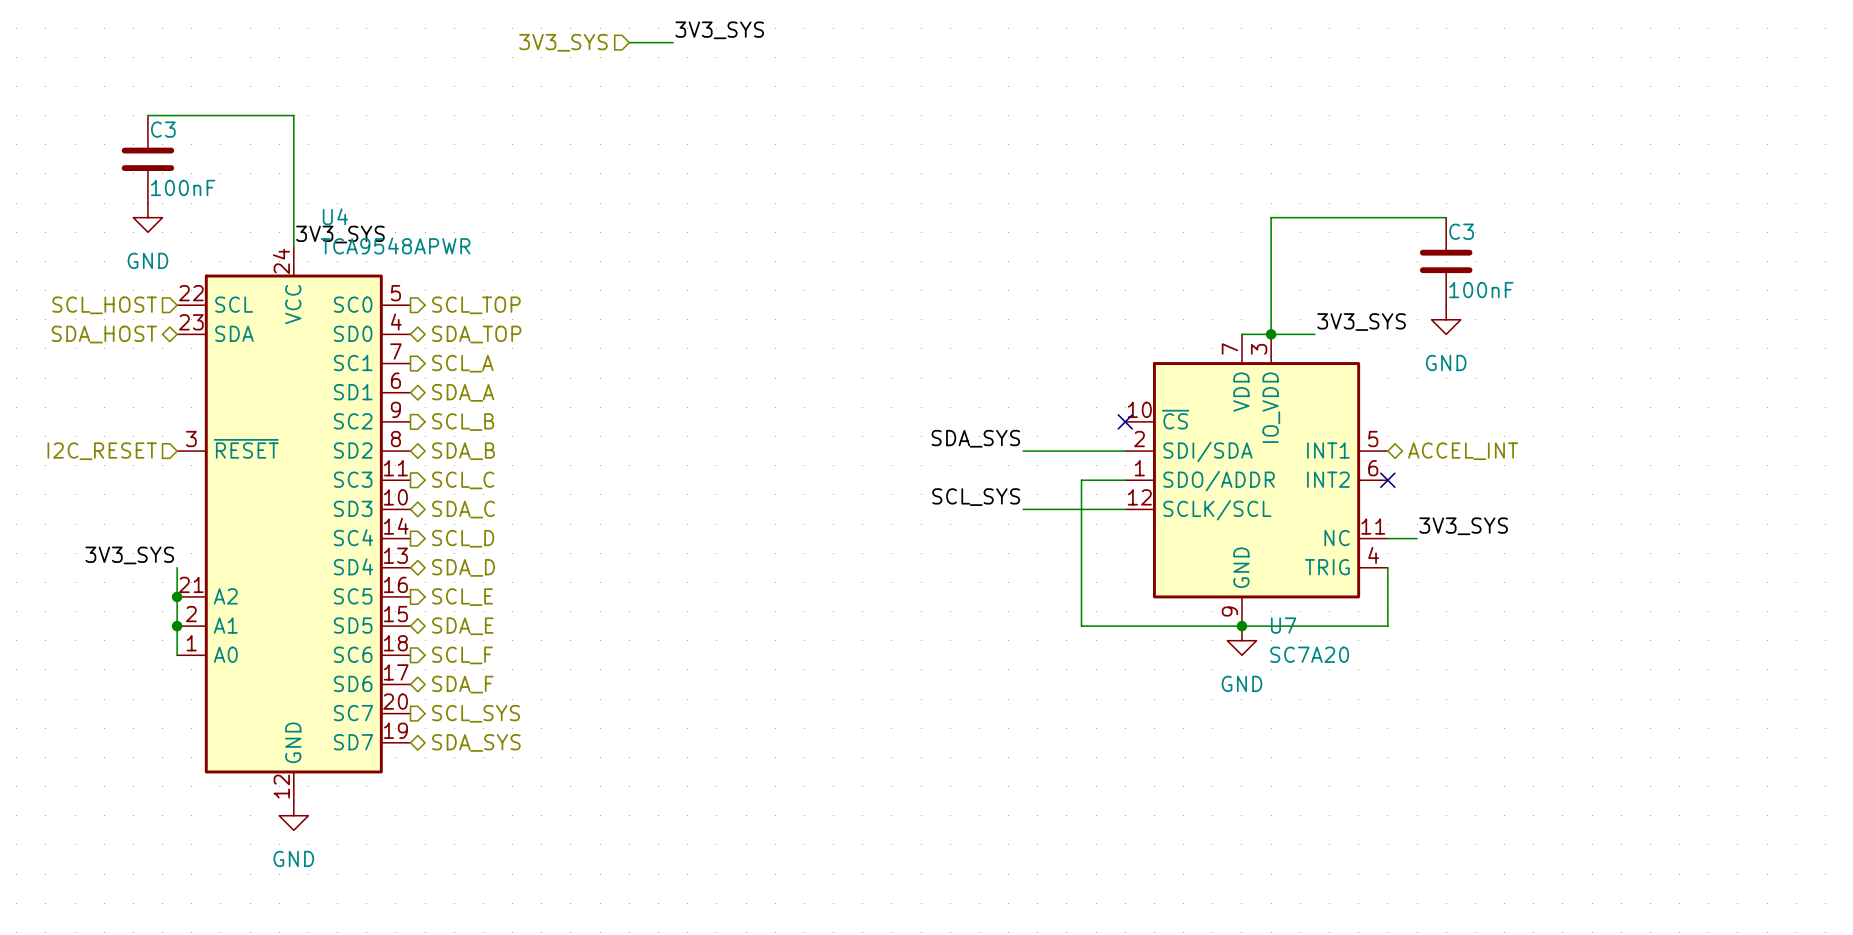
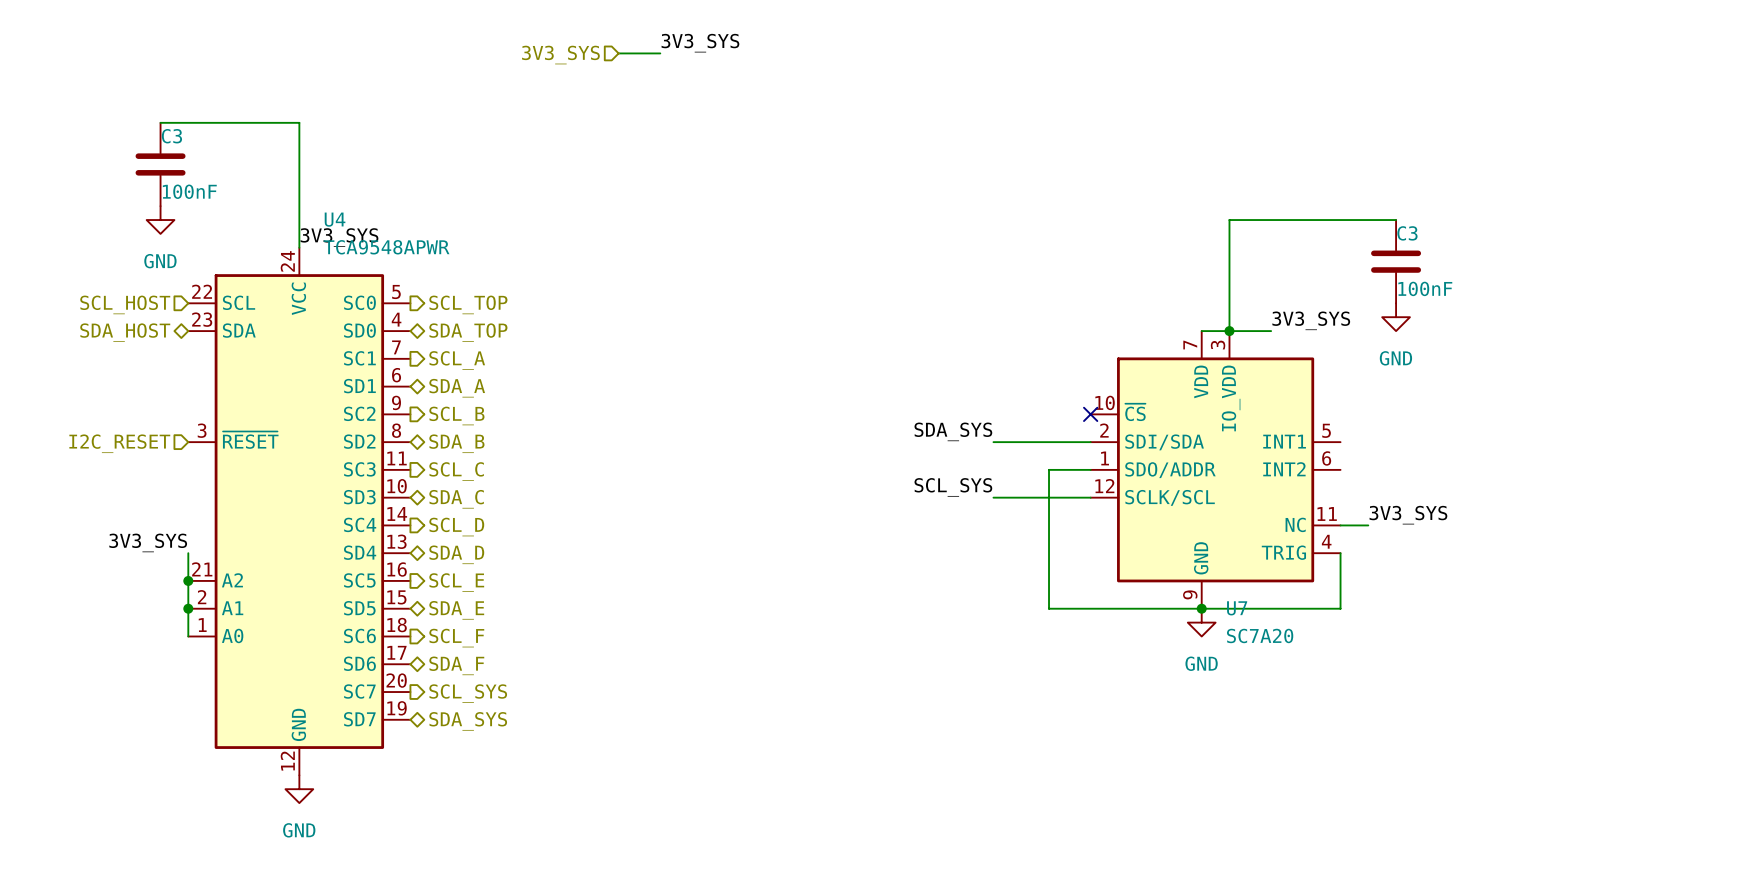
hierarchical label: ACCEL_INT (1463, 451) -> none
no-connect mark: (1387, 480) -> none

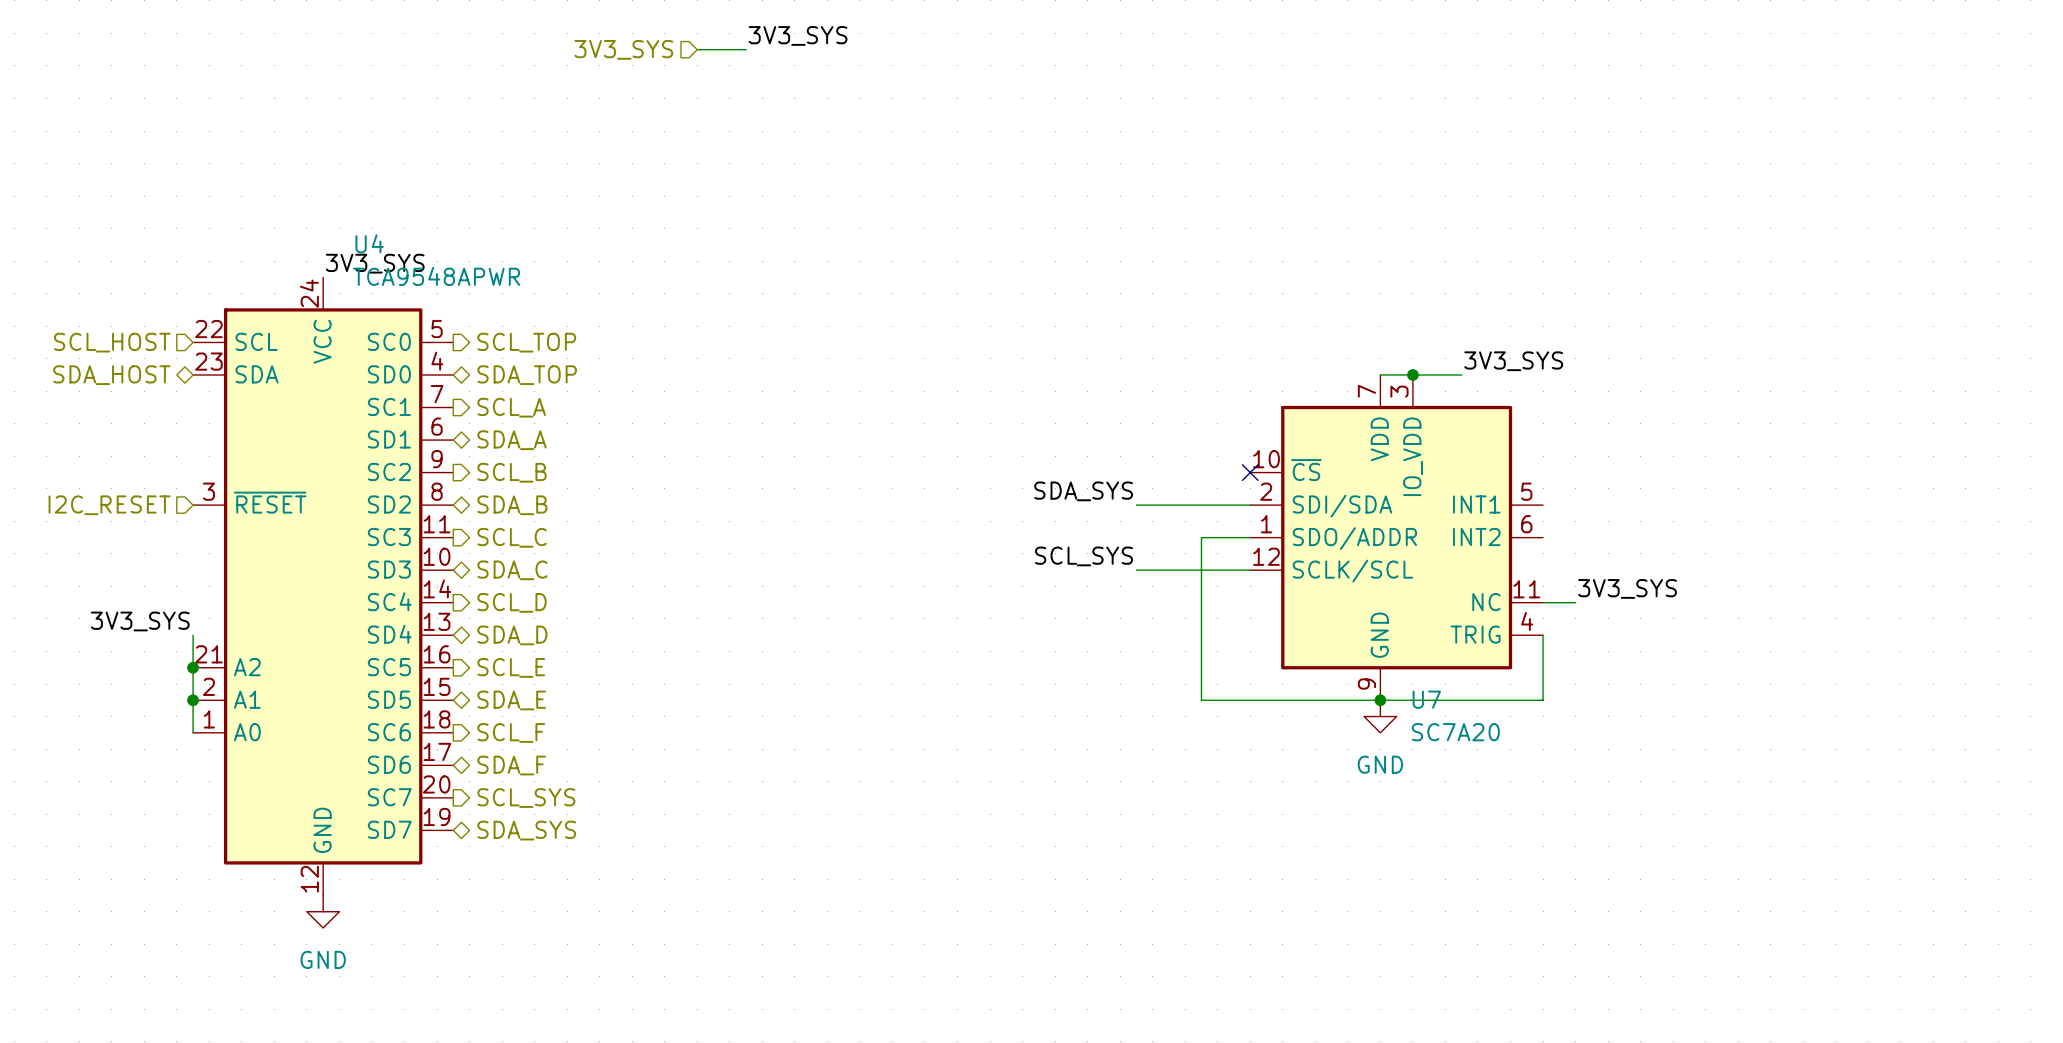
wire: (160, 122) (299, 122) (299, 247) -> none
C3: 100nF (160, 164) -> none
power symbol: GND (160, 220) -> none
wire: (1396, 220) (1229, 220) (1229, 331) -> none
C3: 100nF (1396, 261) -> none
power symbol: GND (1396, 317) -> none

